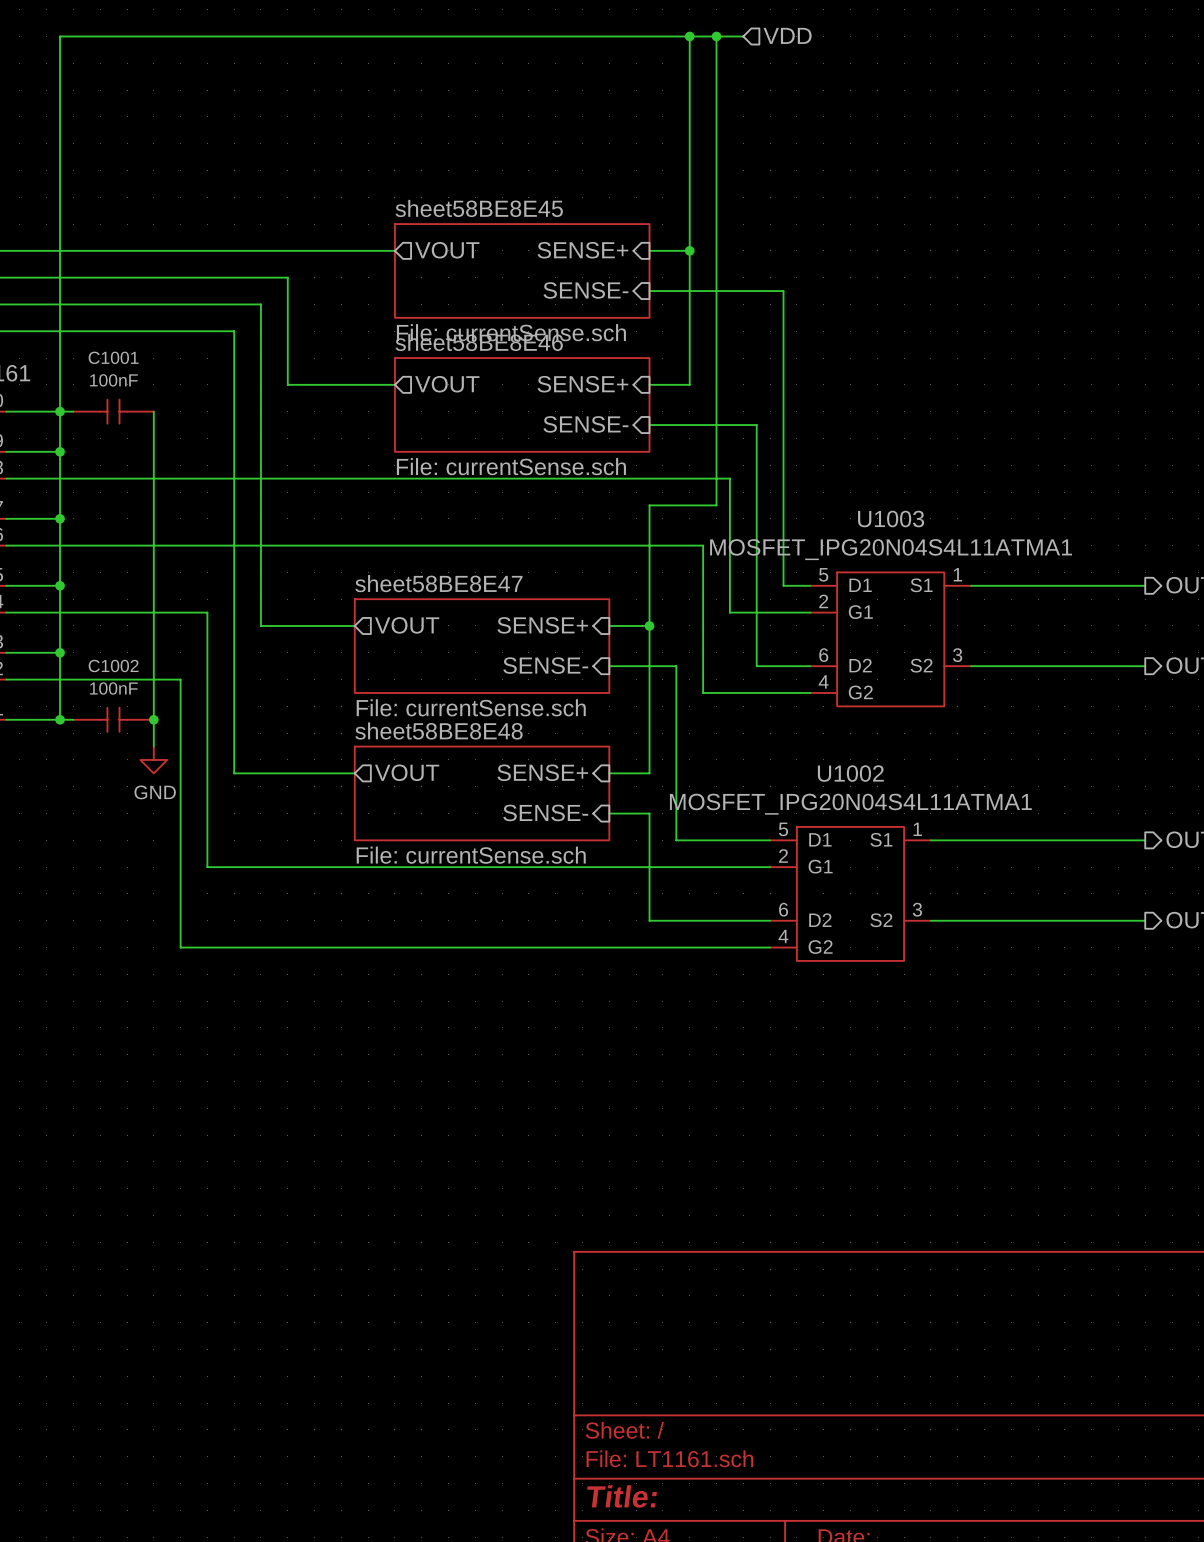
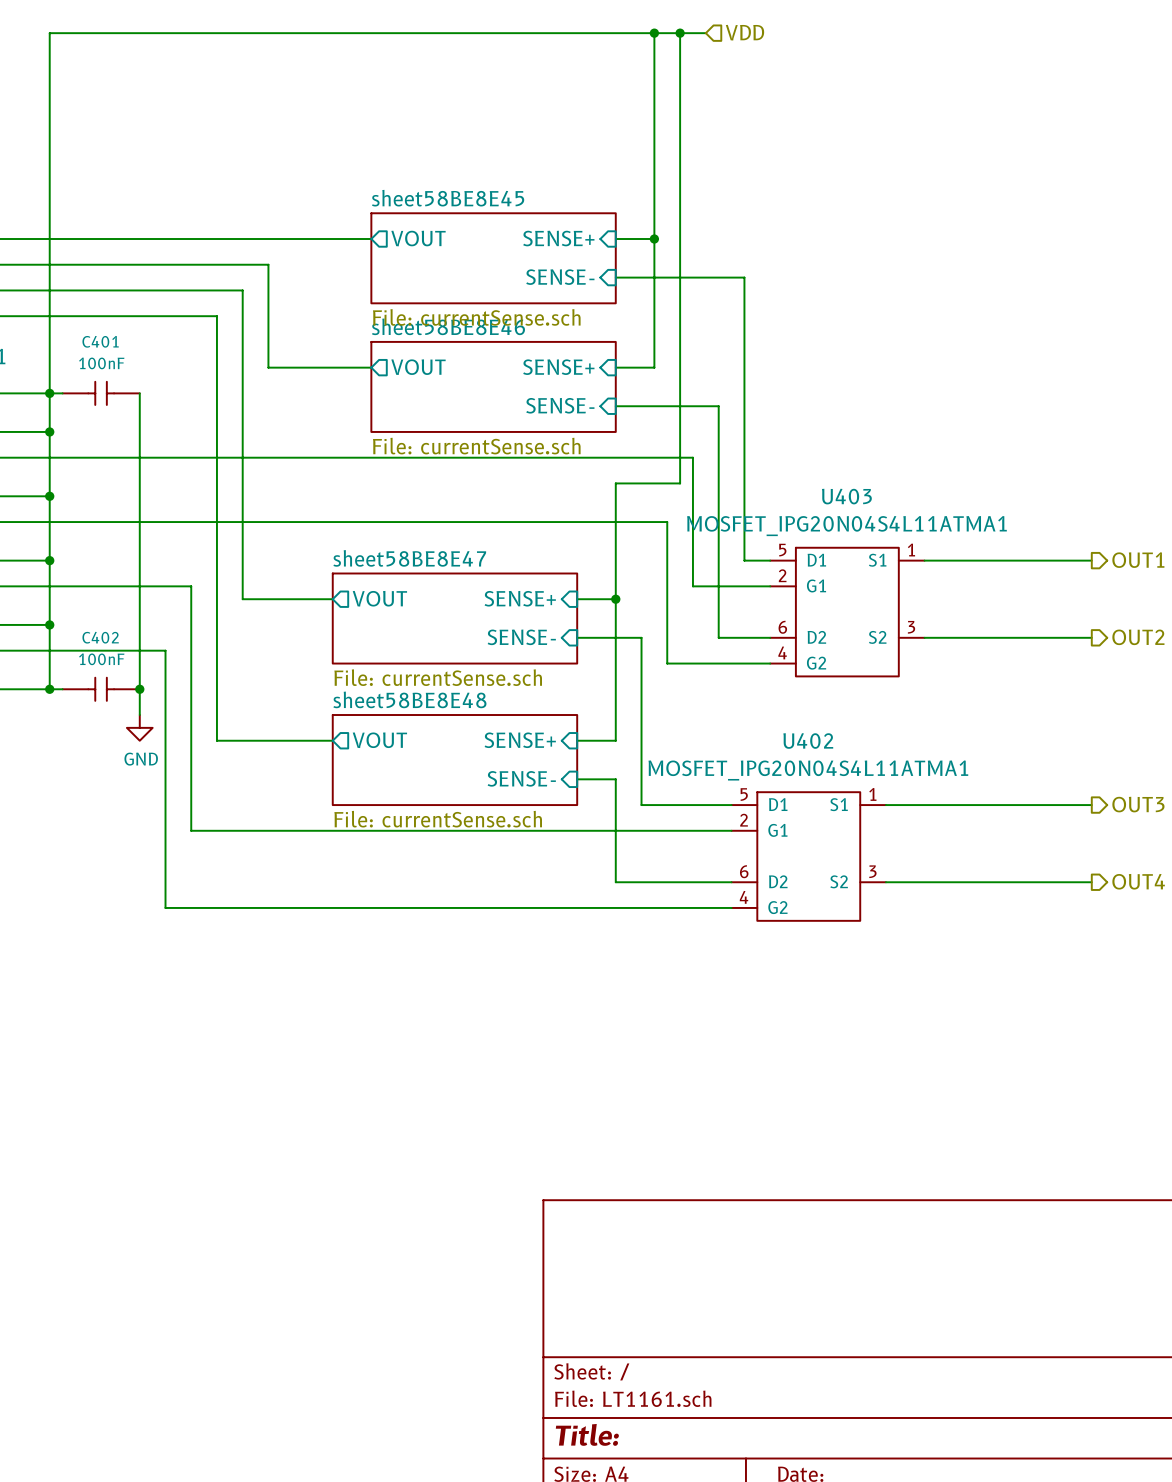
C1001 name: C1001 (113, 357) -> C401 (100, 341)
U1003 name: U1003 (891, 519) -> U403 (846, 496)
C1002 name: C1002 (113, 666) -> C402 (100, 637)
U1002 name: U1002 (850, 773) -> U402 (808, 741)

